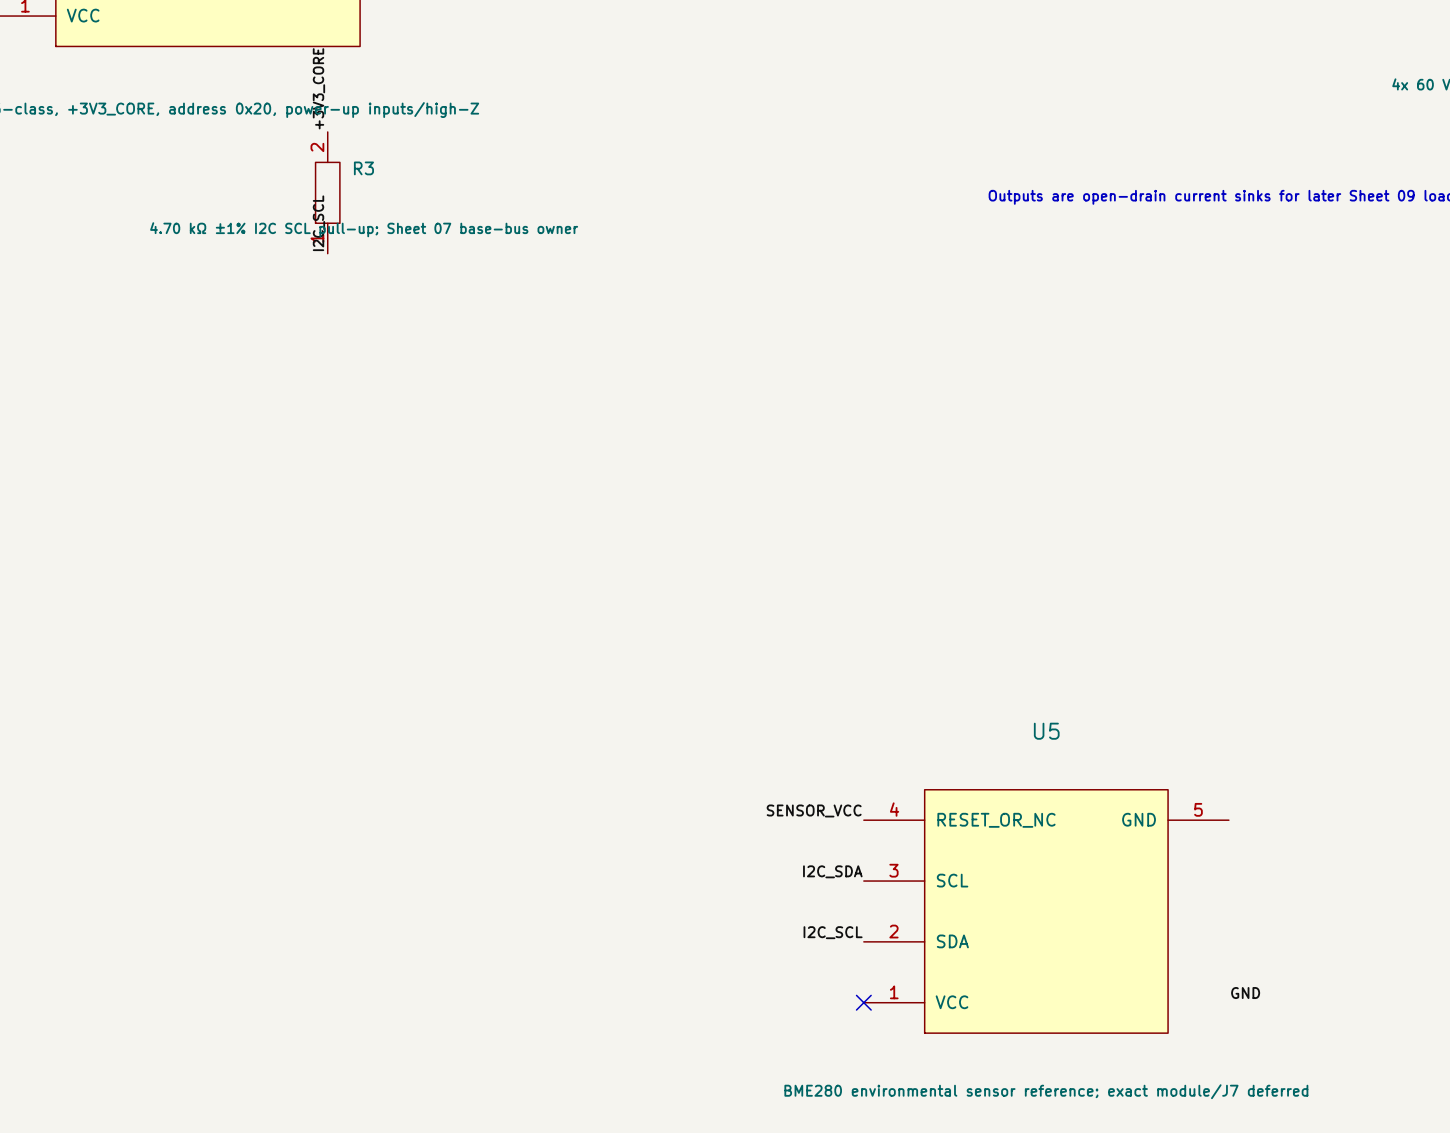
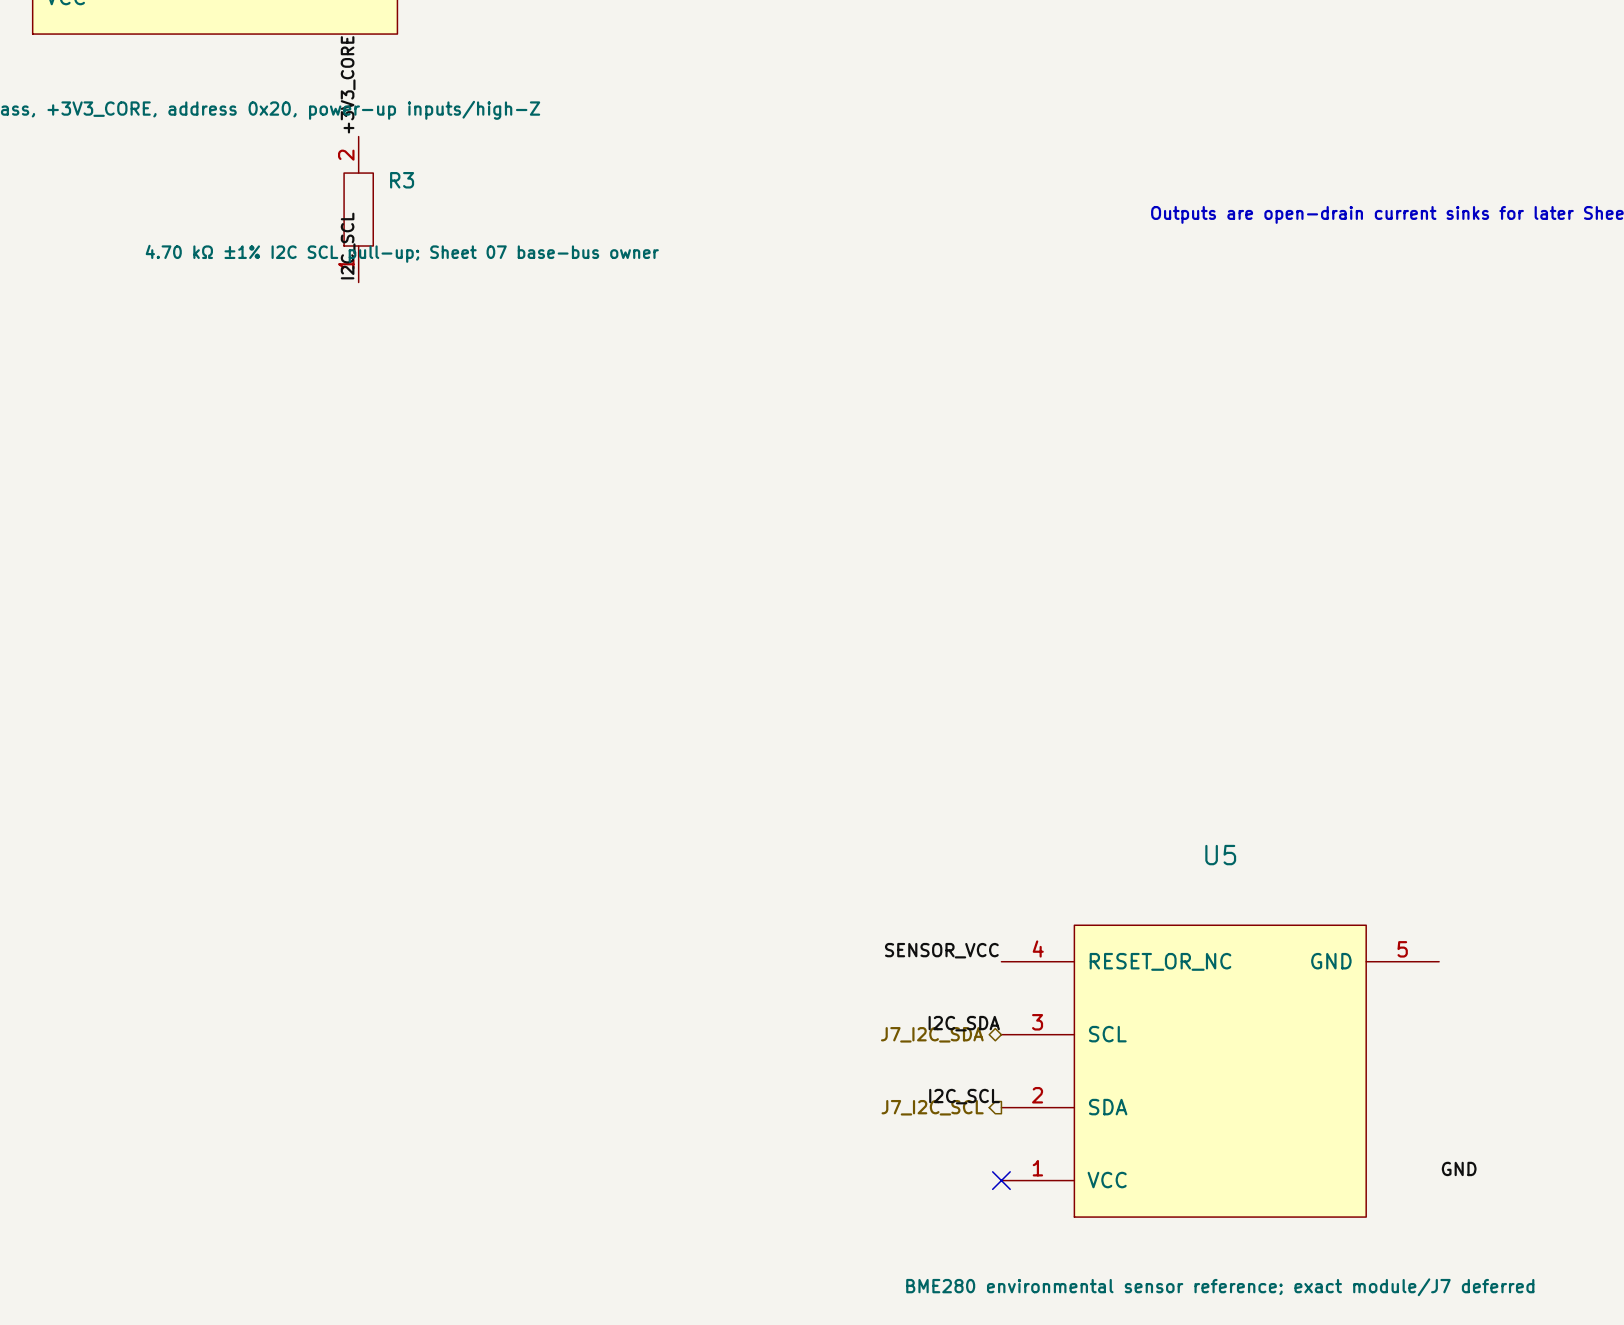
hierarchical label: none -> J7_I2C_SDA (932, 1034)
hierarchical label: none -> J7_I2C_SCL (932, 1107)

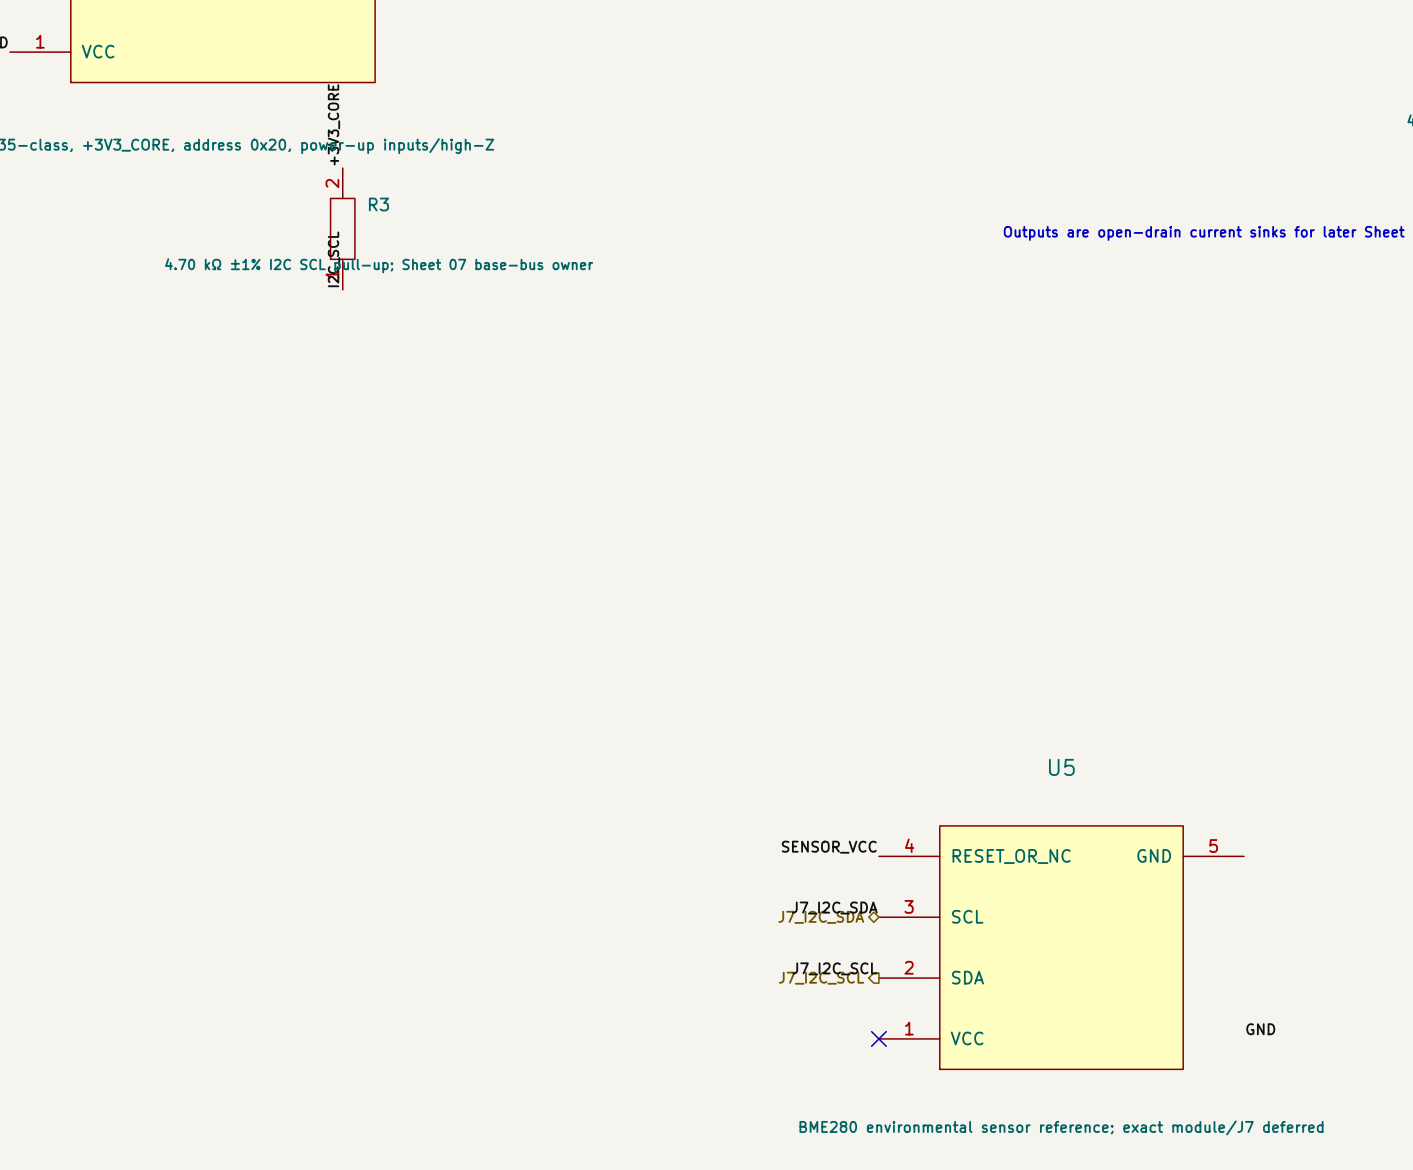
label: I2C_SDA (964, 1023) -> J7_I2C_SDA (834, 908)
label: I2C_SCL (964, 1096) -> J7_I2C_SCL (835, 968)

